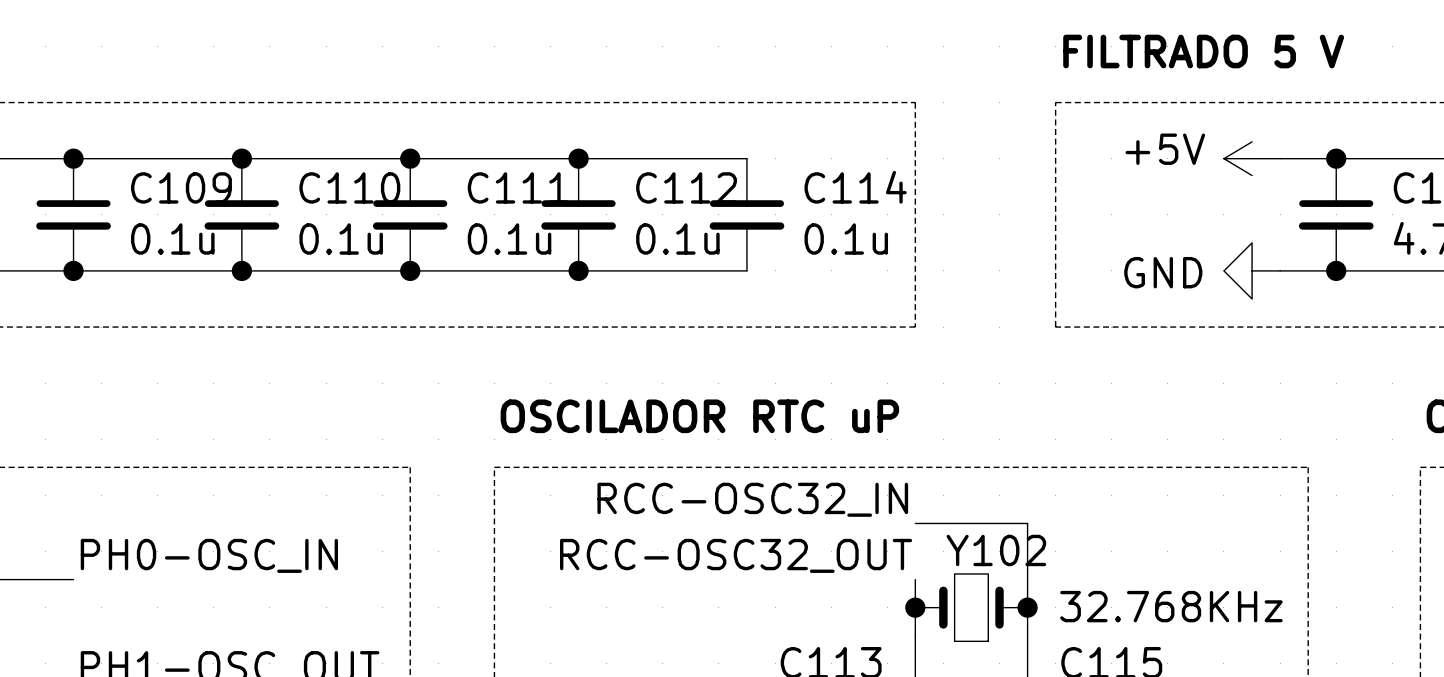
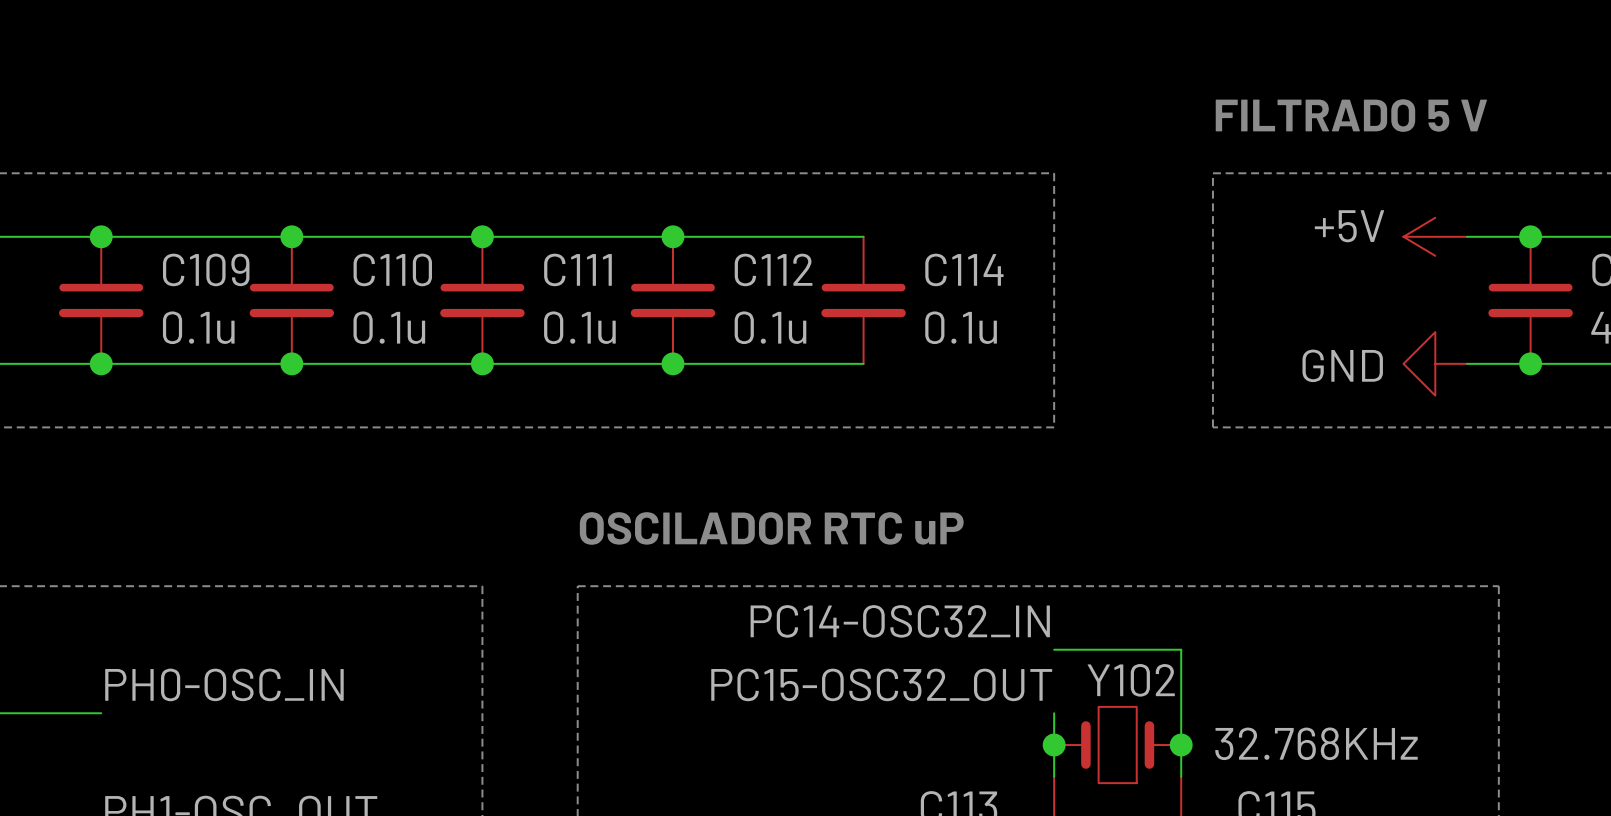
label: RCC-OSC32_IN (752, 499) -> PC14-OSC32_IN (900, 621)
label: RCC-OSC32_OUT (736, 555) -> PC15-OSC32_OUT (881, 684)

